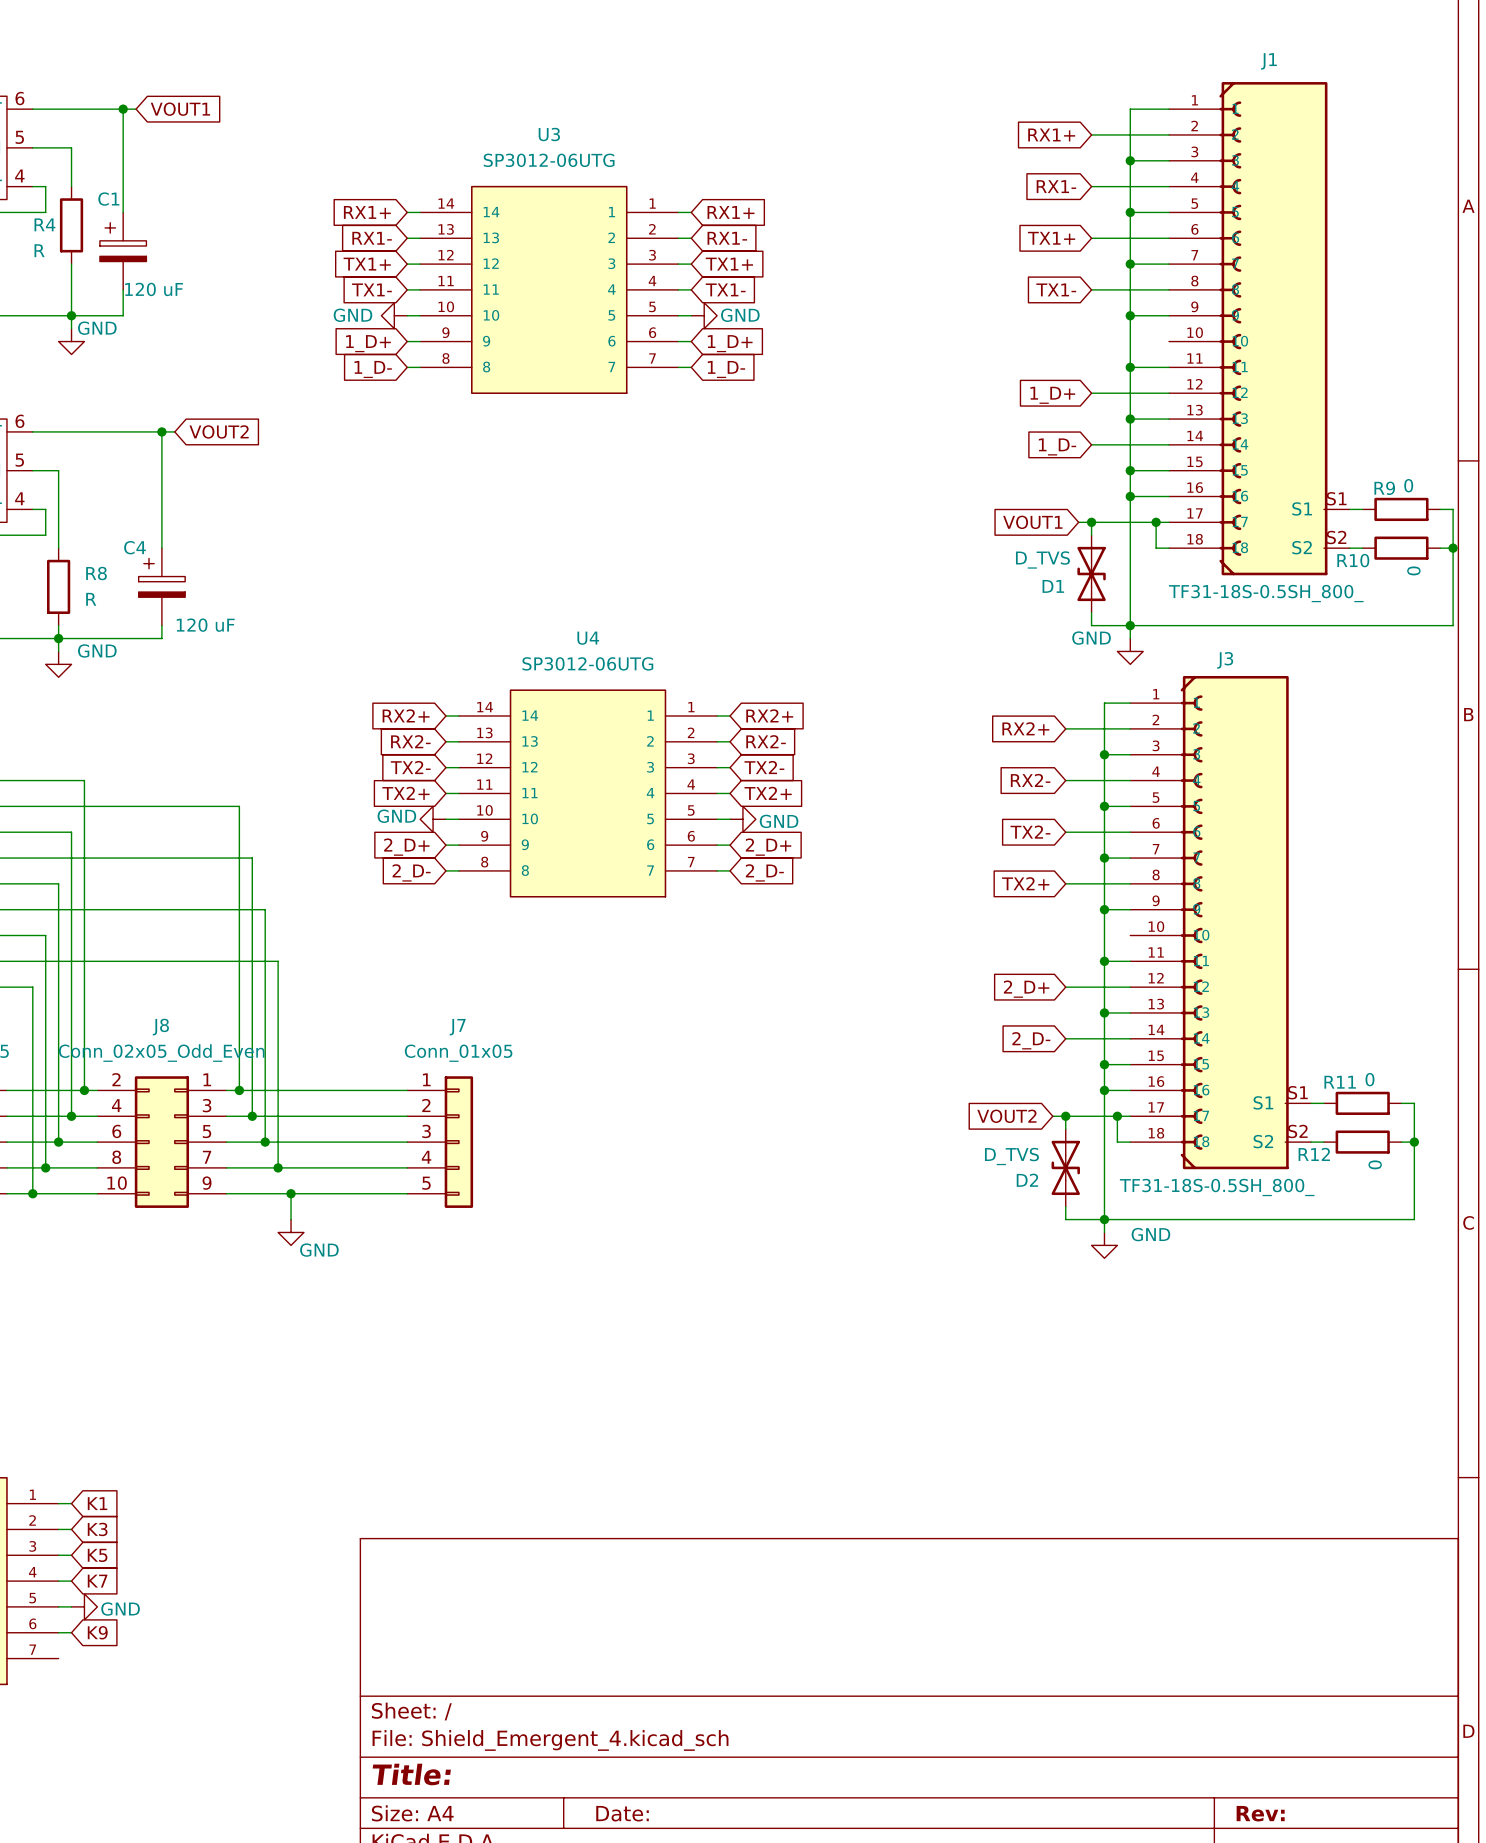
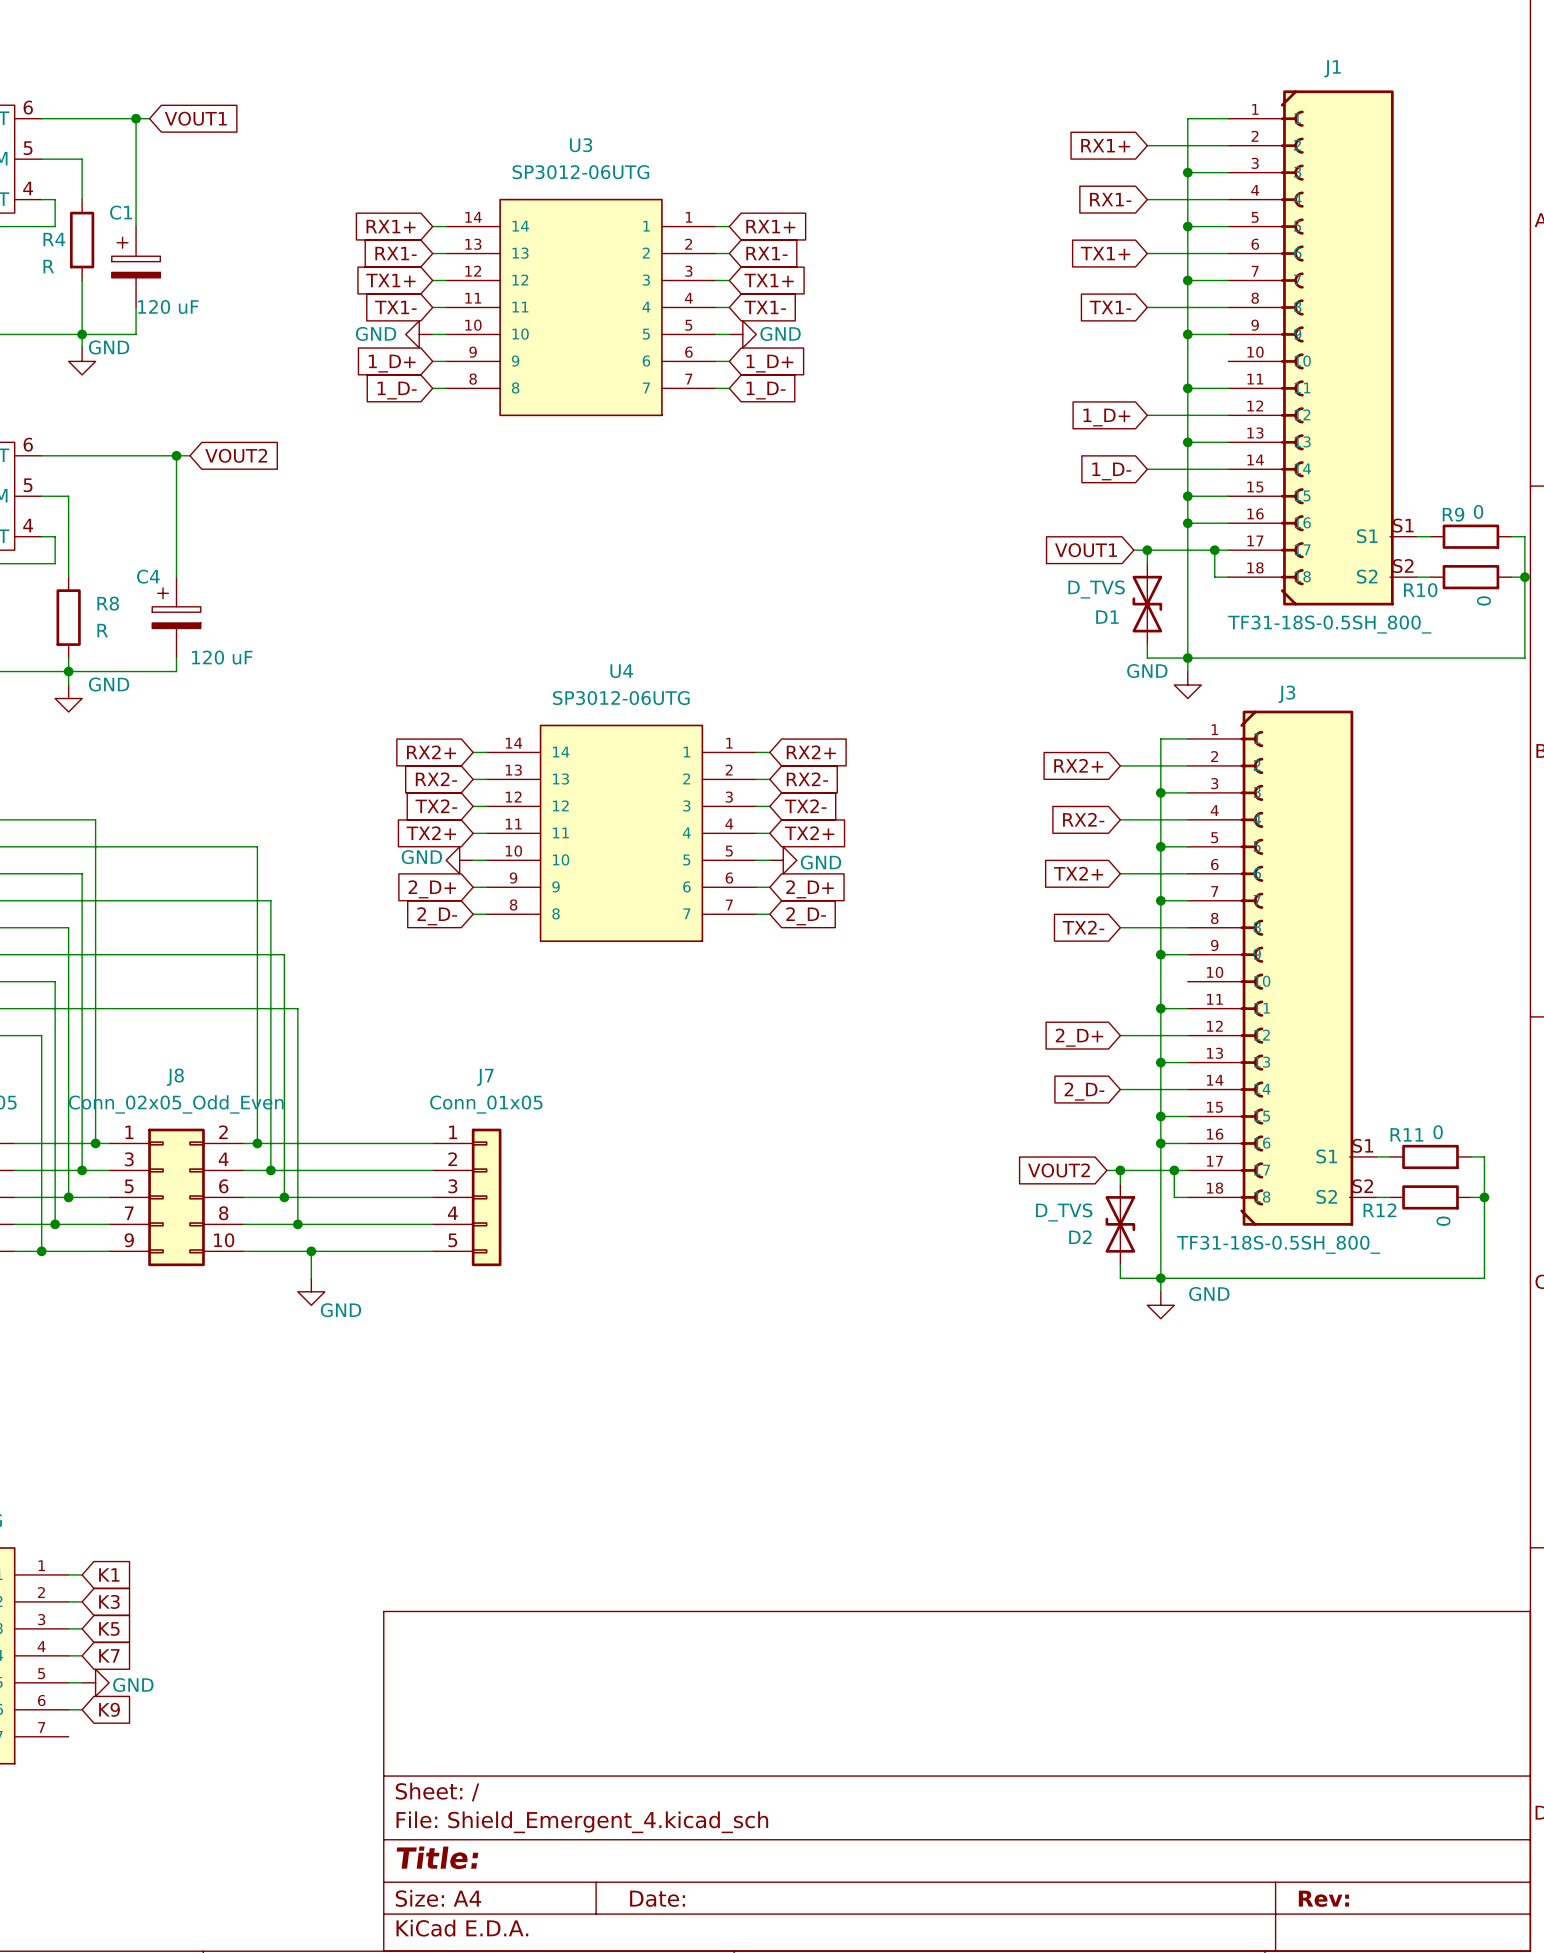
global label: TX2- (1030, 832) -> TX2+ (1078, 873)
global label: TX2+ (1025, 883) -> TX2- (1083, 927)
J8 flip: as is (161, 1142) -> left-right (176, 1197)

